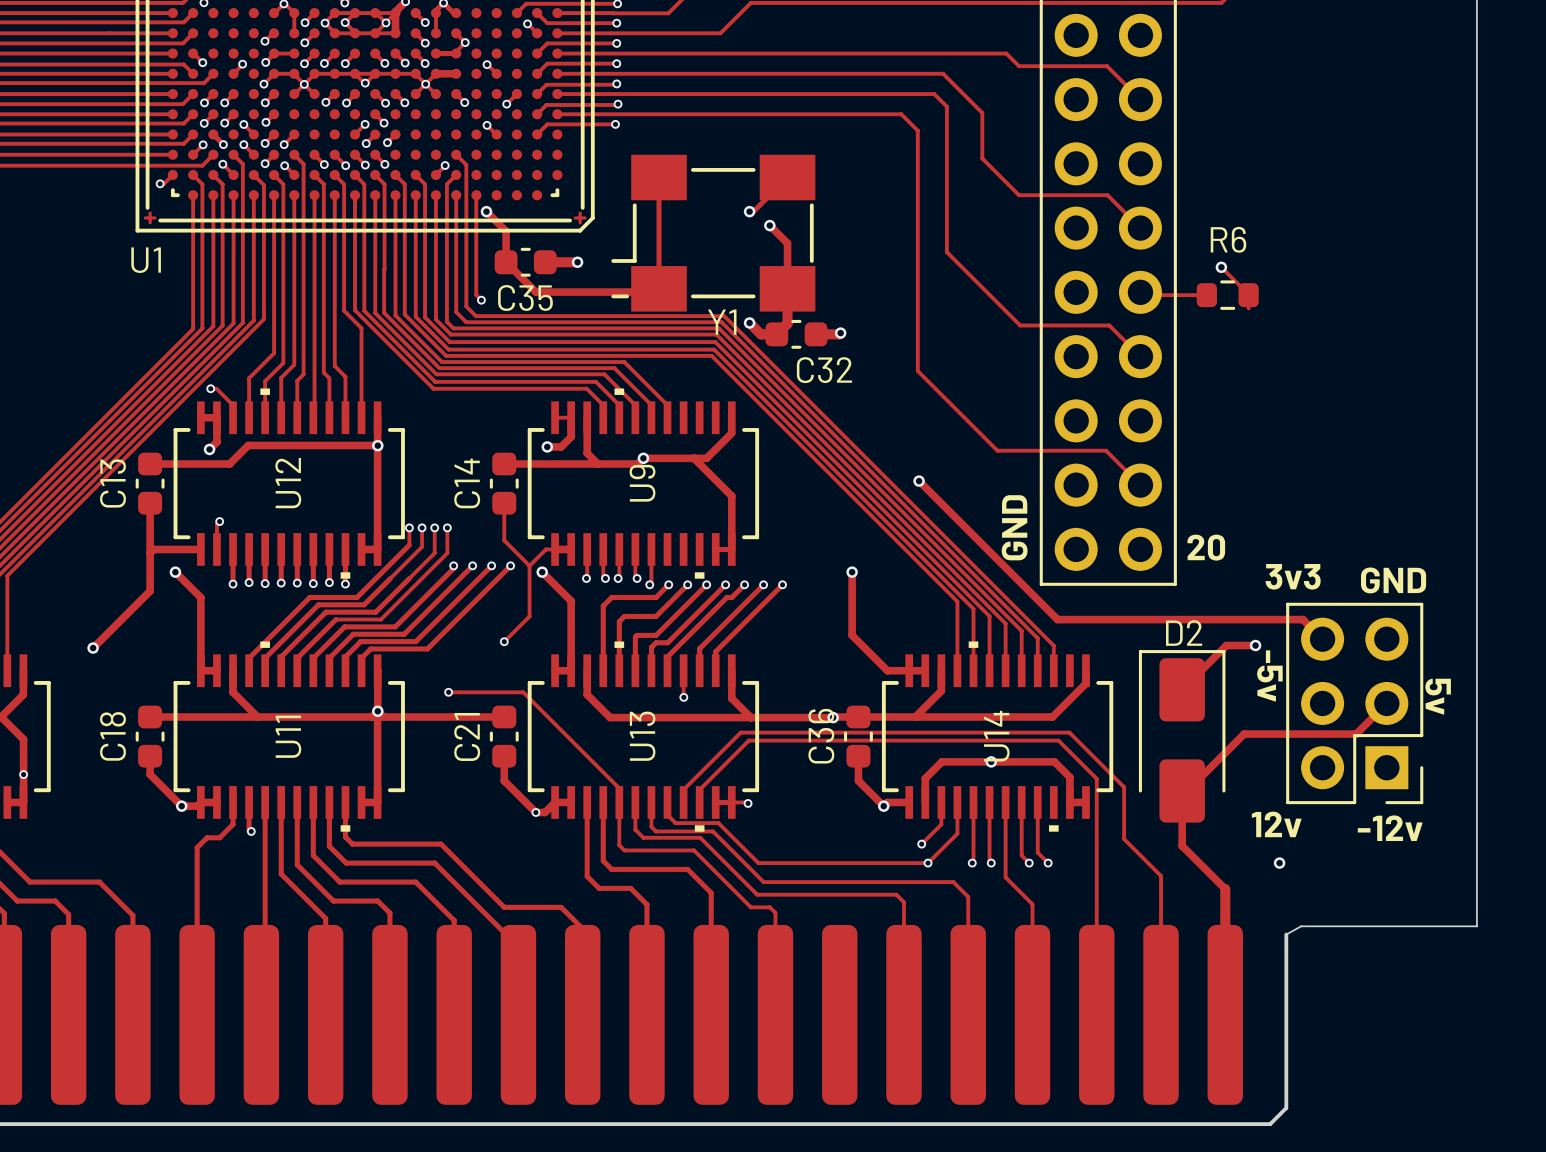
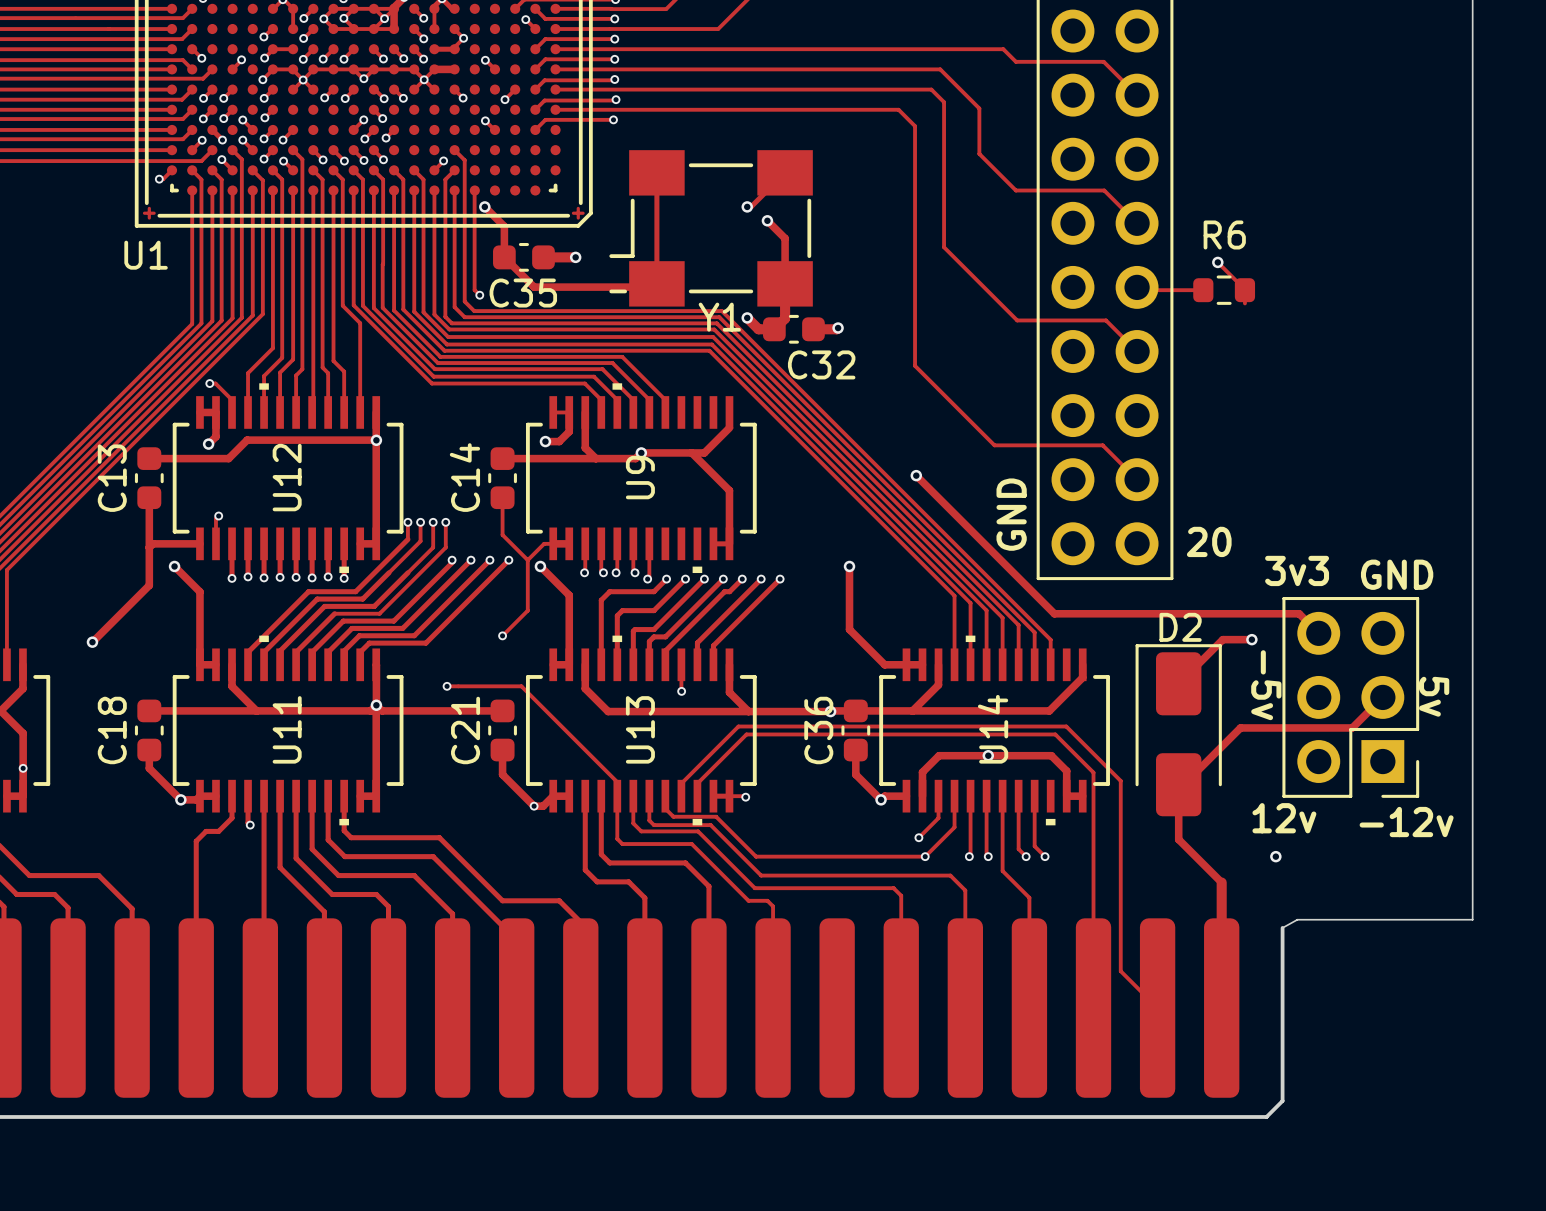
track: (1124, 839) (1161, 875) (1161, 1014) -> (1120, 832) (1120, 971) (1157, 1008)

